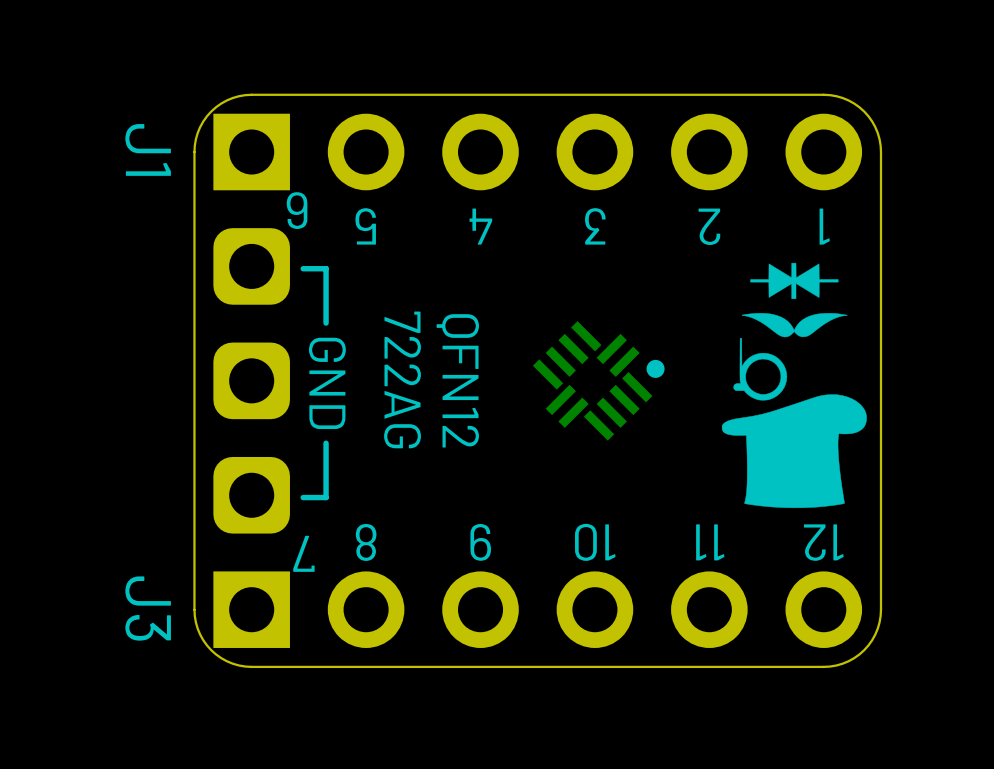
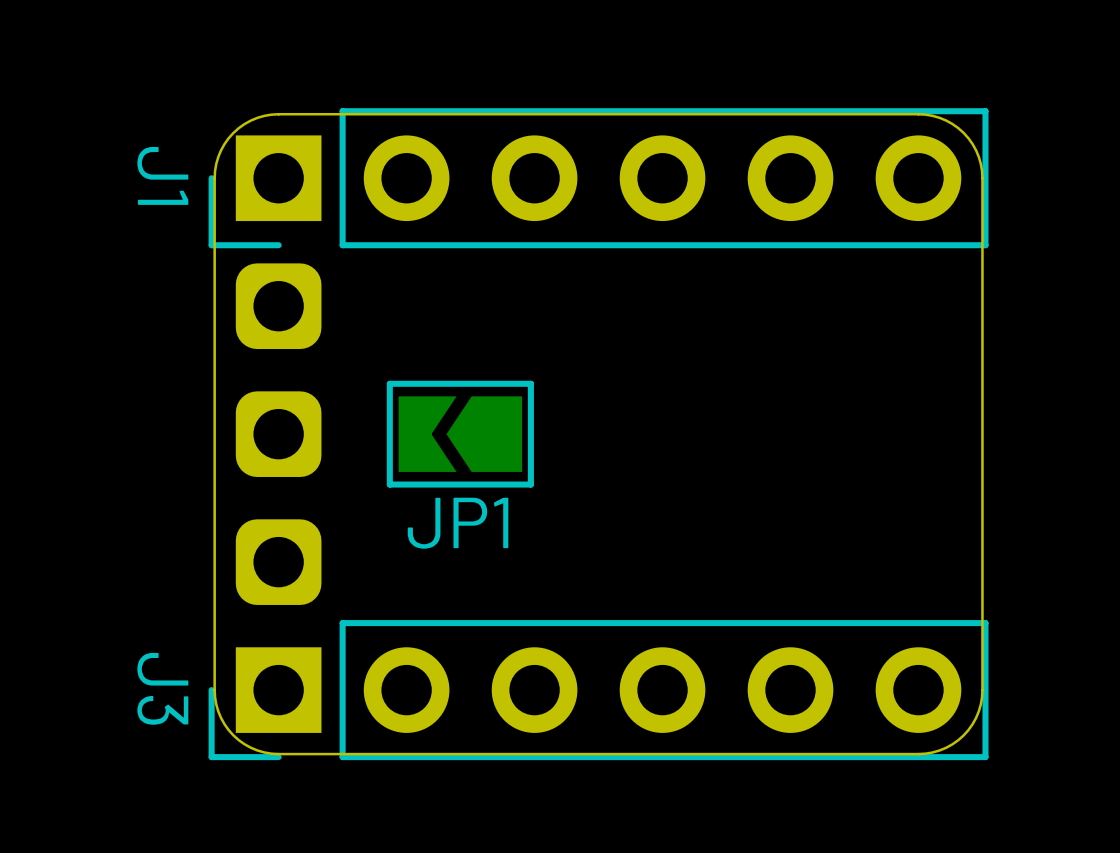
J1 footprint: [213, 113, 863, 191] -> [208, 108, 989, 249]
text: 6 (297, 210) -> none
text: 5 (365, 226) -> none
text: 4 (480, 226) -> none
text: 3 (595, 226) -> none
text: 2 (709, 226) -> none
text: 1 (824, 226) -> none
drawing: [721, 262, 867, 509] -> none
line: (303, 268) (326, 268) (326, 323) -> none
text: 722AG (402, 379) -> none
JP1: none -> (460, 434)
text: QFN12 (457, 380) -> none
part: (598, 380) -> none
text: GND (327, 383) -> none
line: (326, 443) (326, 497) (303, 497) -> none
text: 8 (366, 542) -> none
text: 9 (480, 542) -> none
text: 10 (595, 542) -> none
text: 11 (710, 542) -> none
text: 12 (823, 542) -> none
text: 7 (303, 553) -> none
J3 footprint: [213, 571, 863, 648] -> [208, 620, 989, 761]

